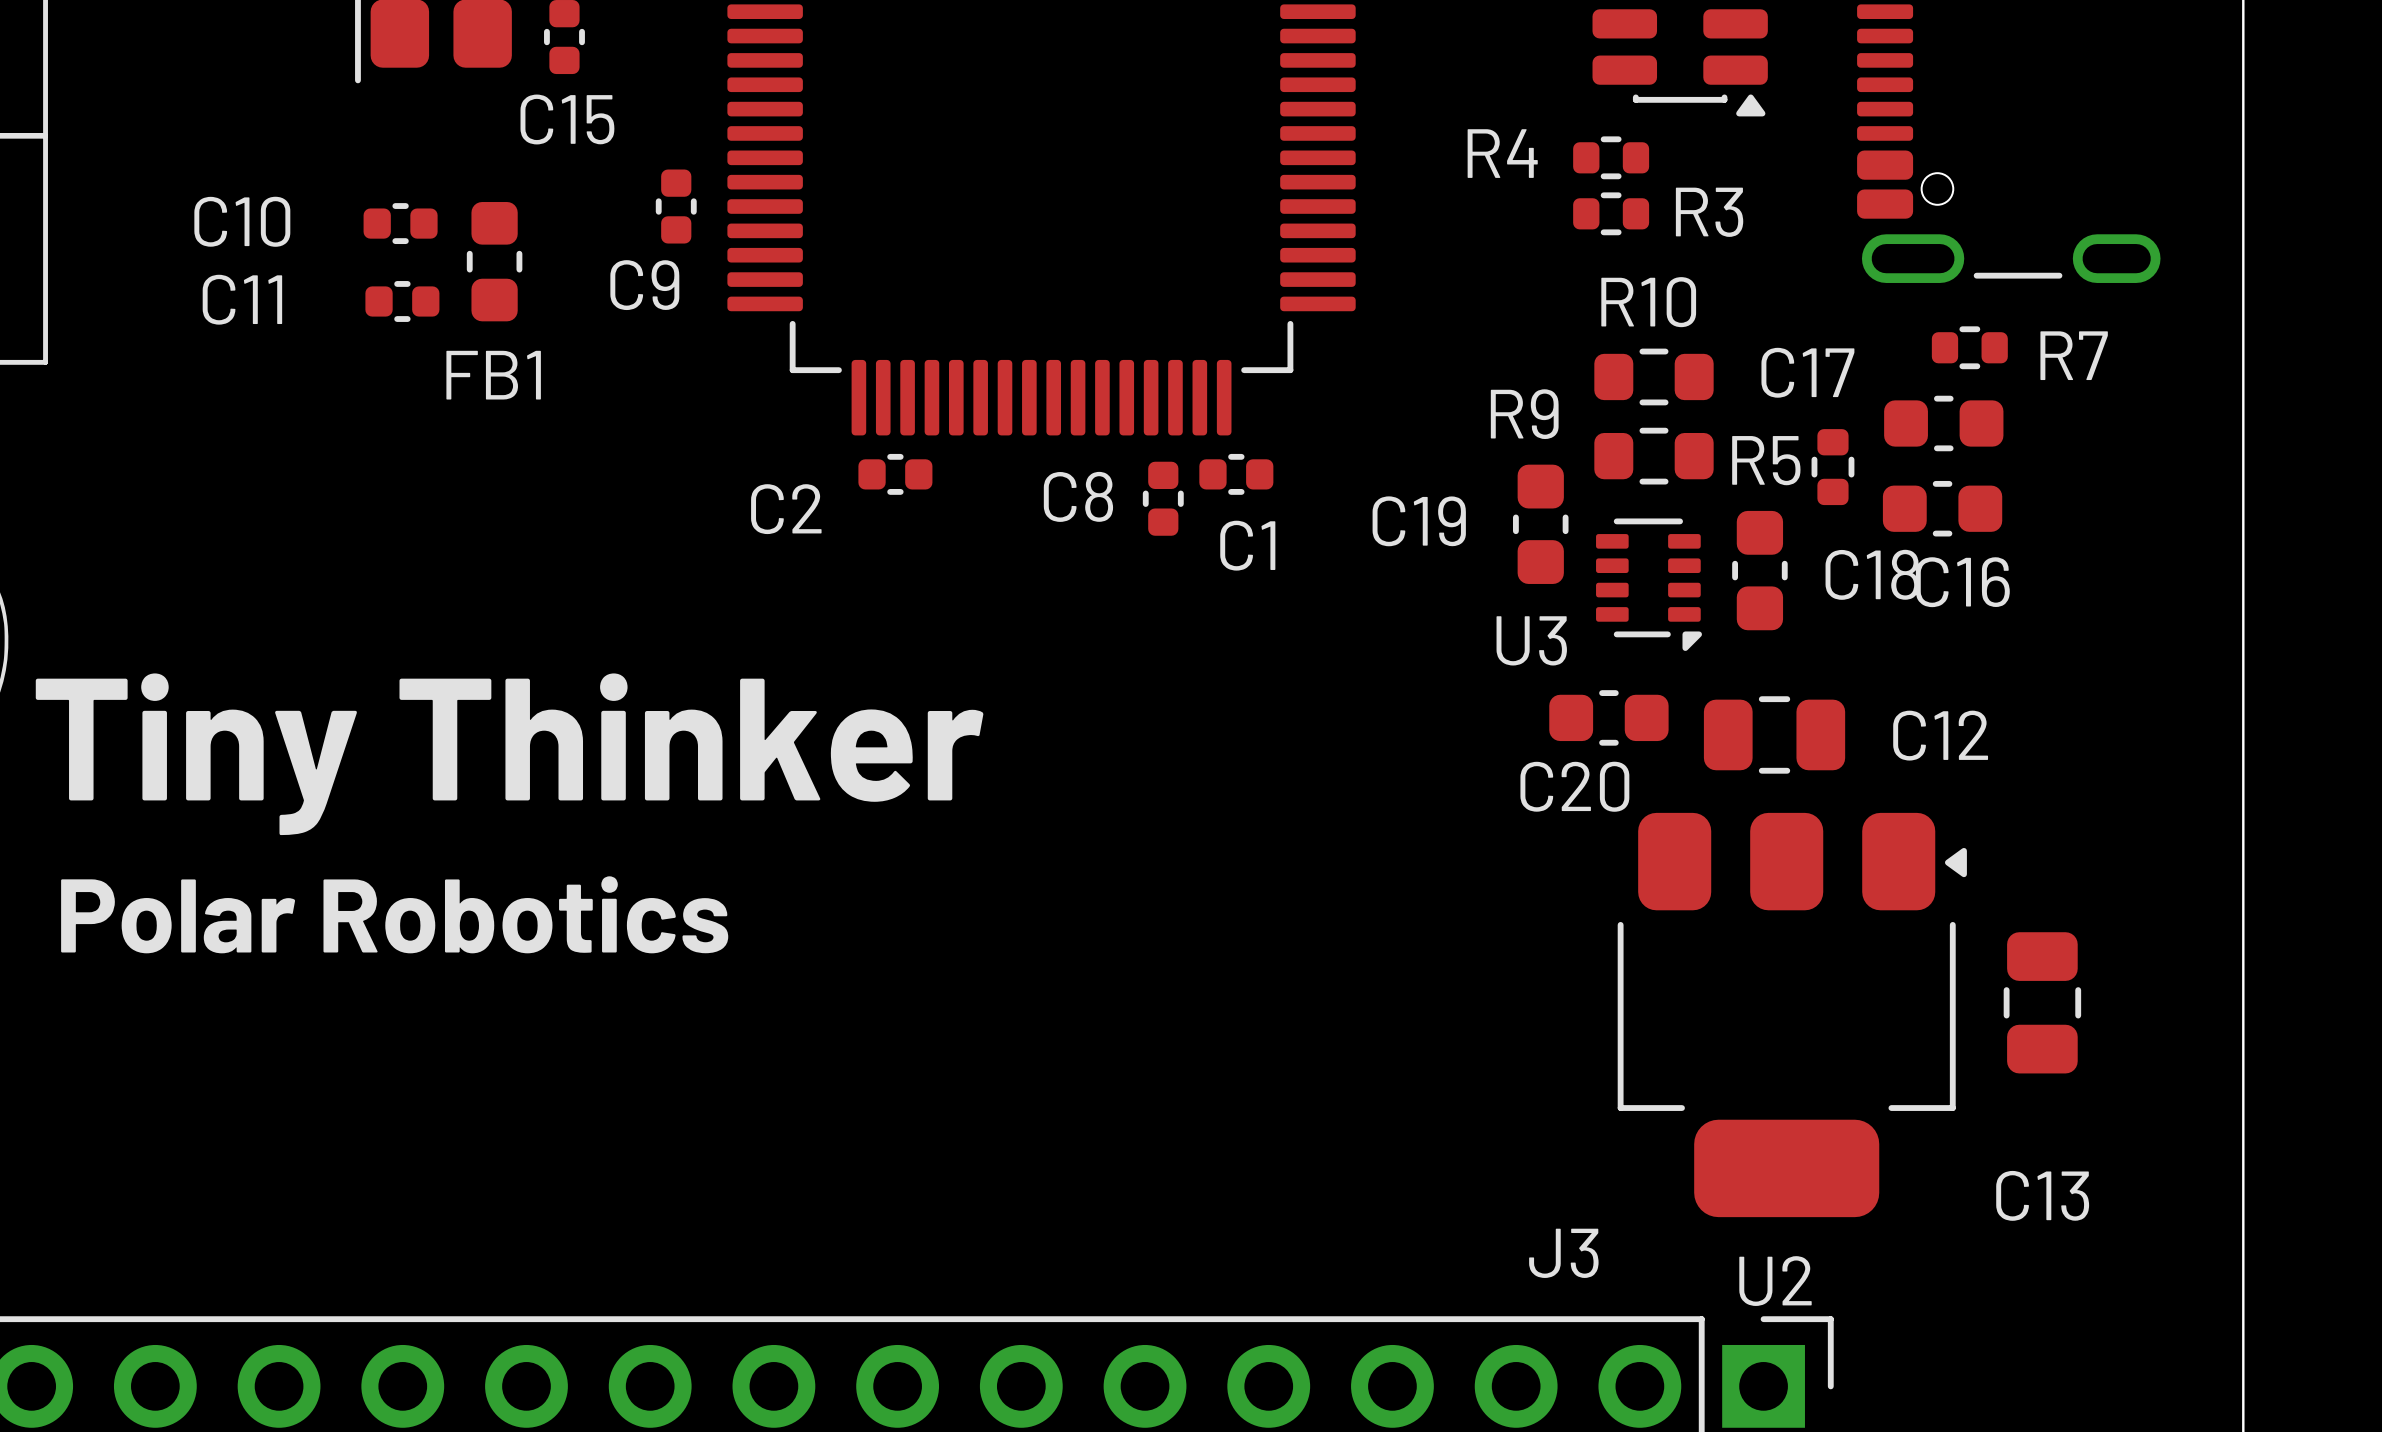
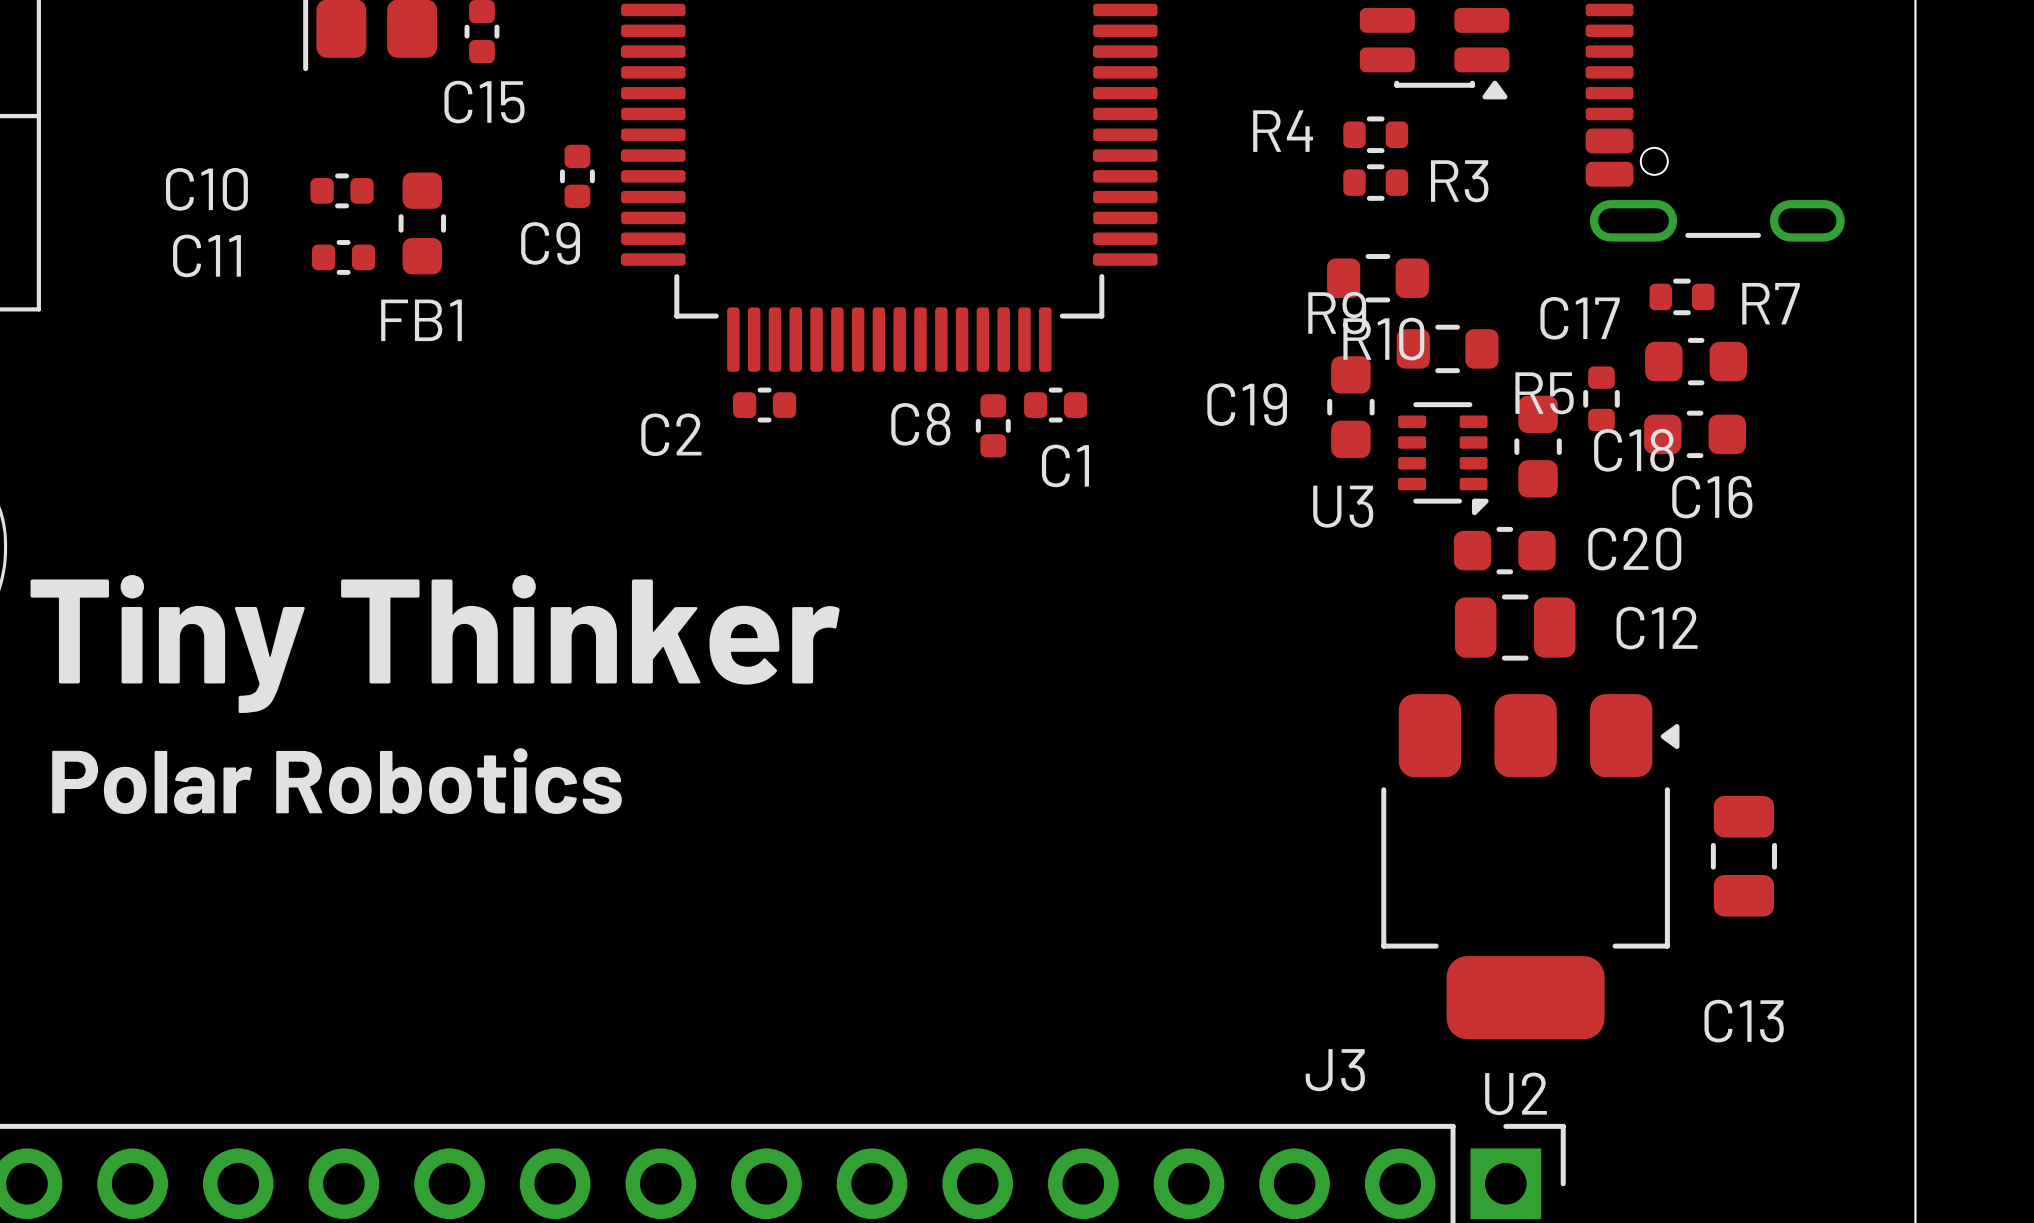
R10 name position: R10 (1648, 302) -> R10 (1383, 339)
R10 position: (1653, 376) -> (1377, 278)
C17 position: (1943, 423) -> (1696, 361)
R9 position: (1653, 456) -> (1447, 348)
R5 position: (1832, 467) -> (1601, 398)
C16 position: (1942, 508) -> (1695, 434)
C19 position: (1540, 524) -> (1350, 407)
C18 position: (1759, 570) -> (1538, 446)
U3 position: (1649, 584) -> (1443, 458)
C20 position: (1608, 717) -> (1504, 550)
C20 name position: C20 (1574, 786) -> C20 (1634, 549)

